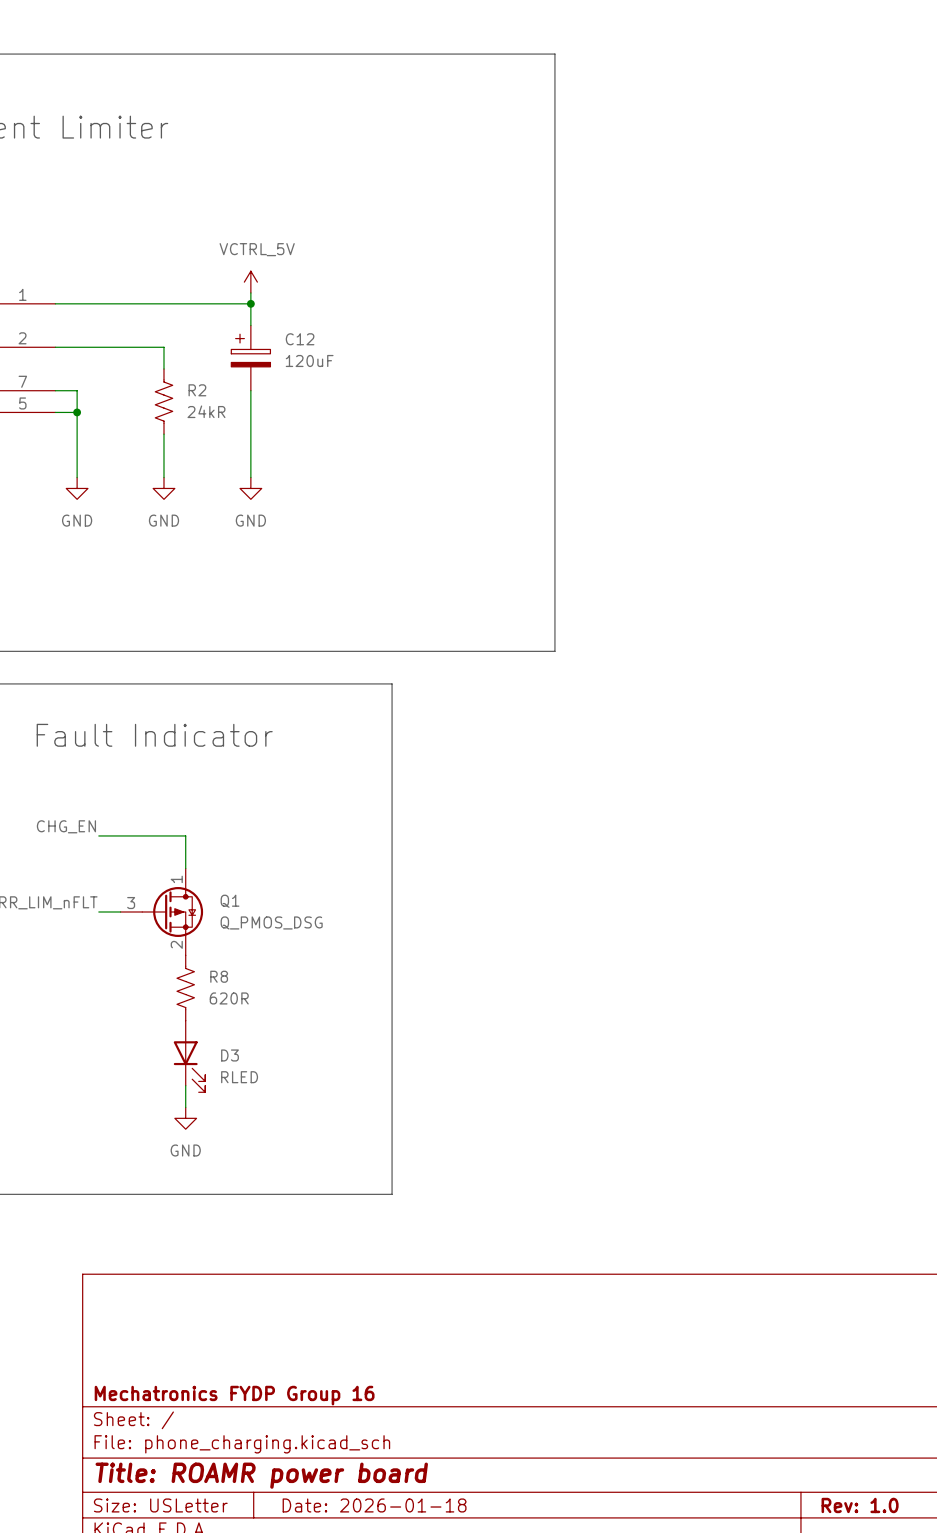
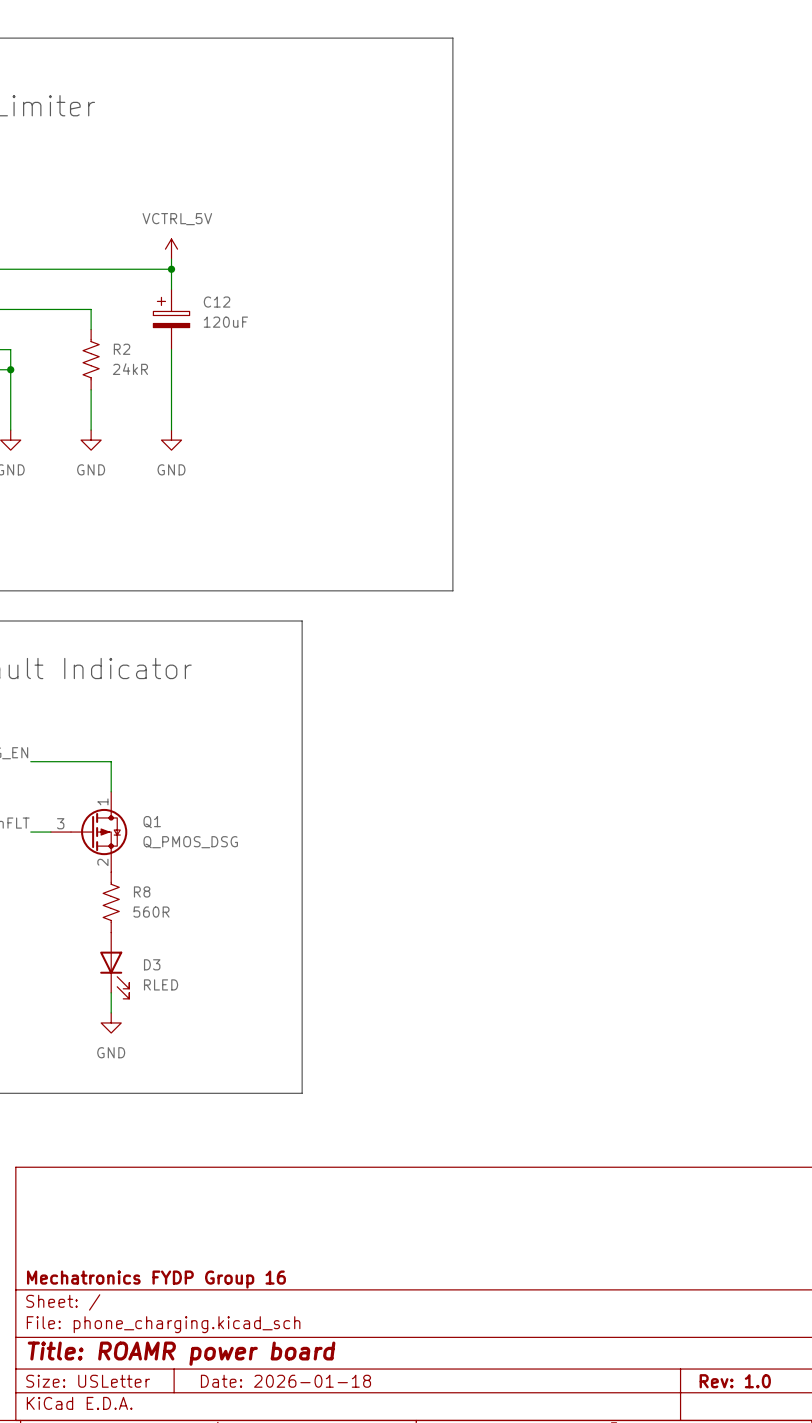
R8 value: 620R (229, 998) -> 560R (151, 912)

